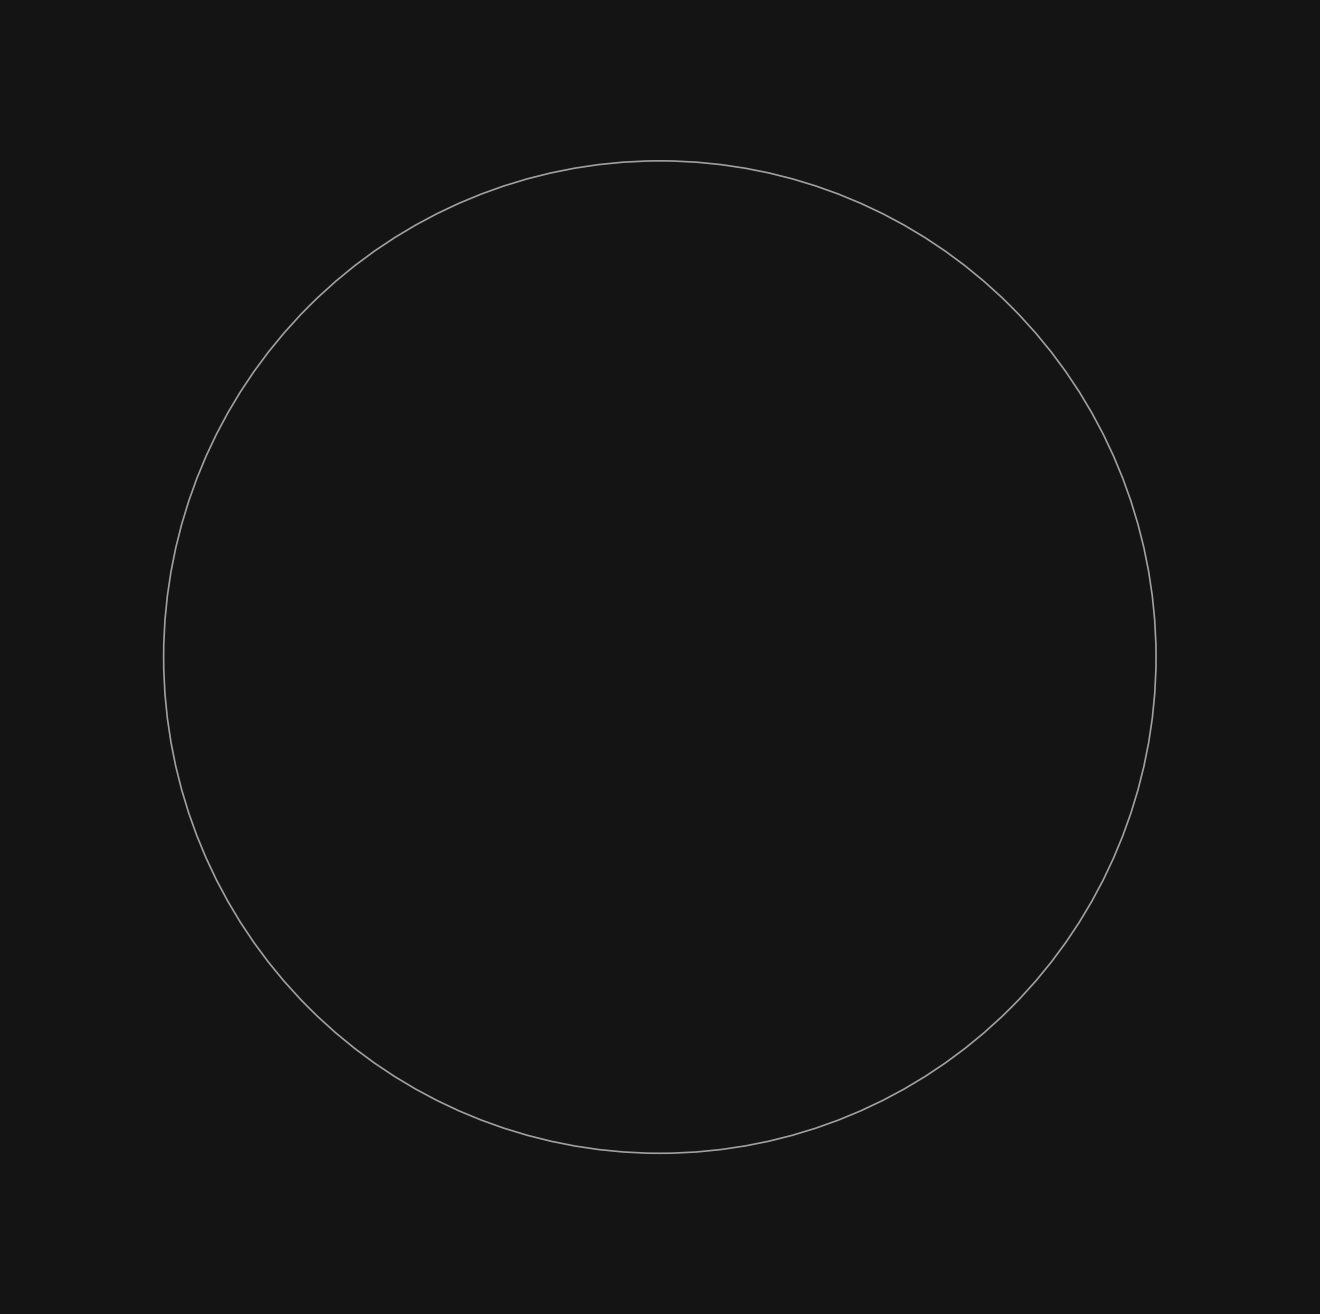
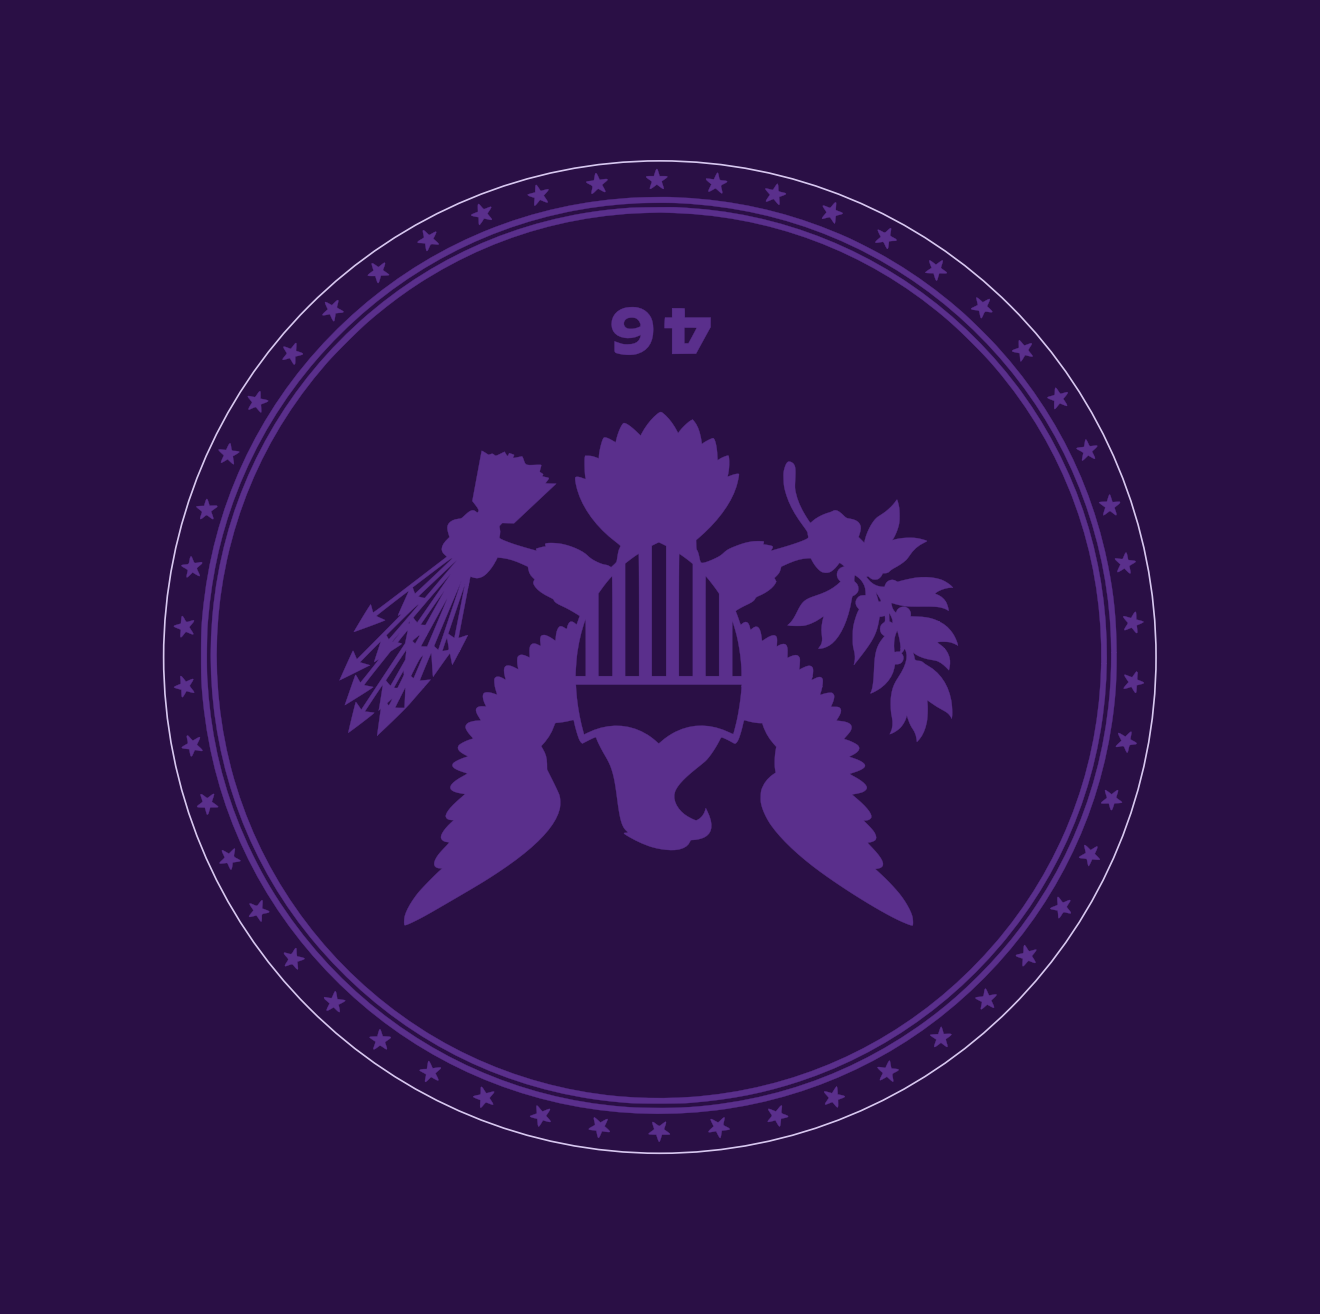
drawing: none -> [173, 168, 1145, 1143]

